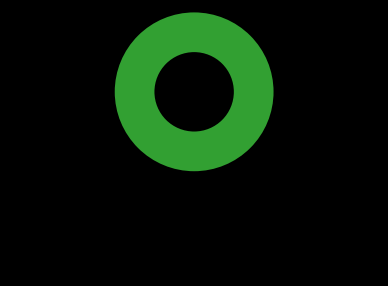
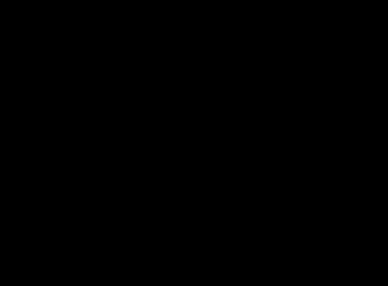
part: (194, 91) -> none

